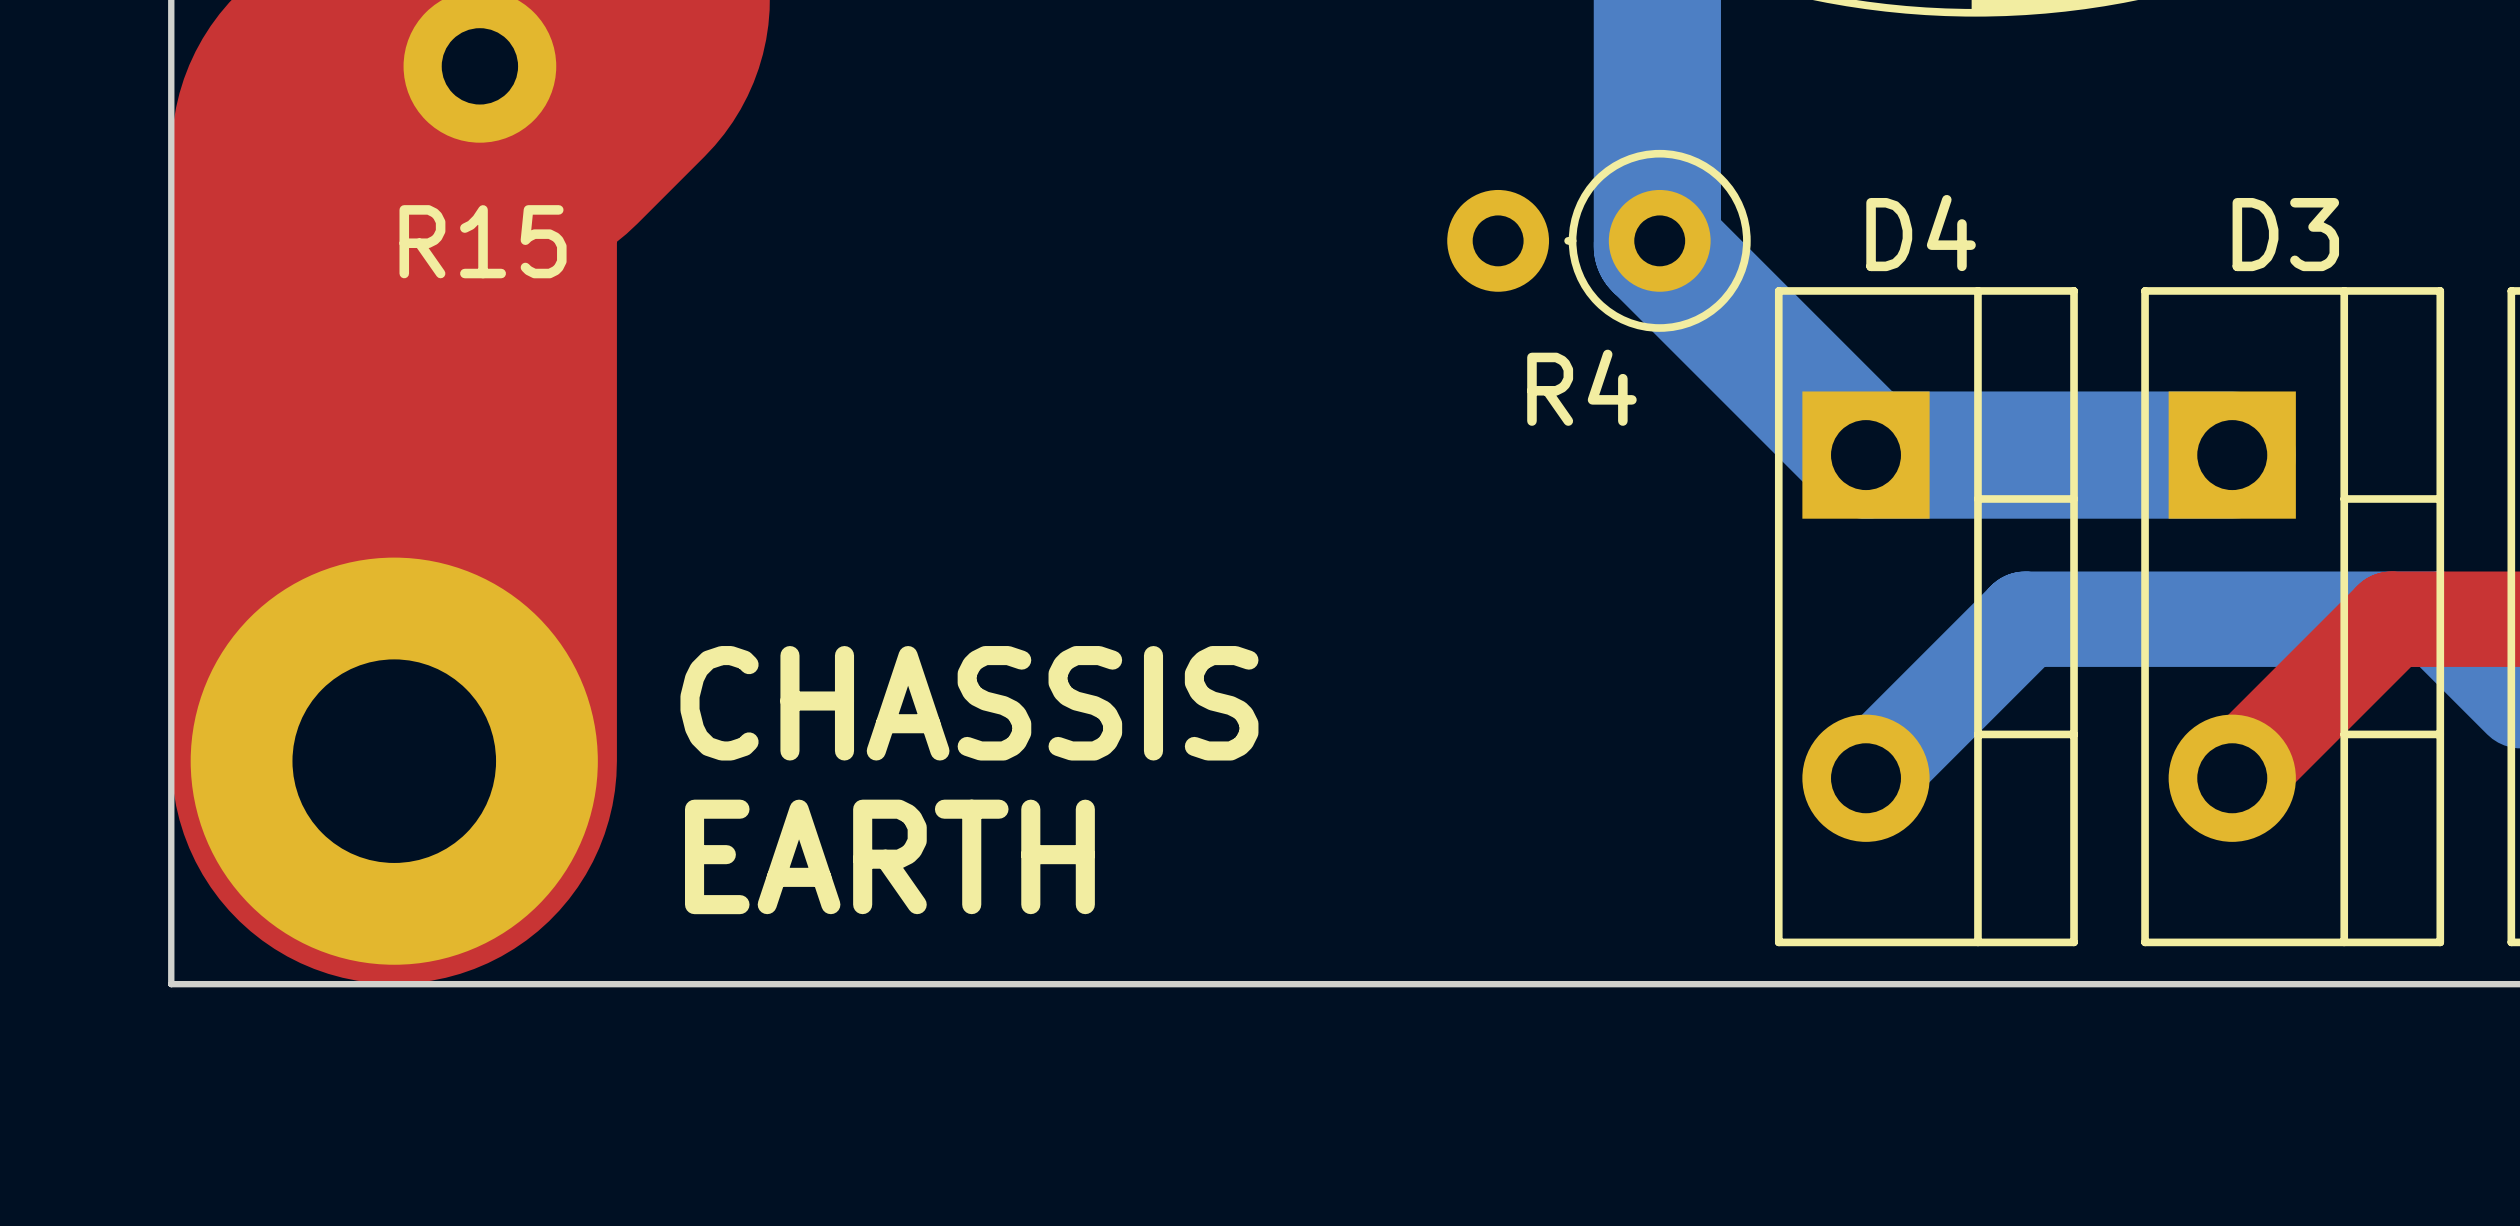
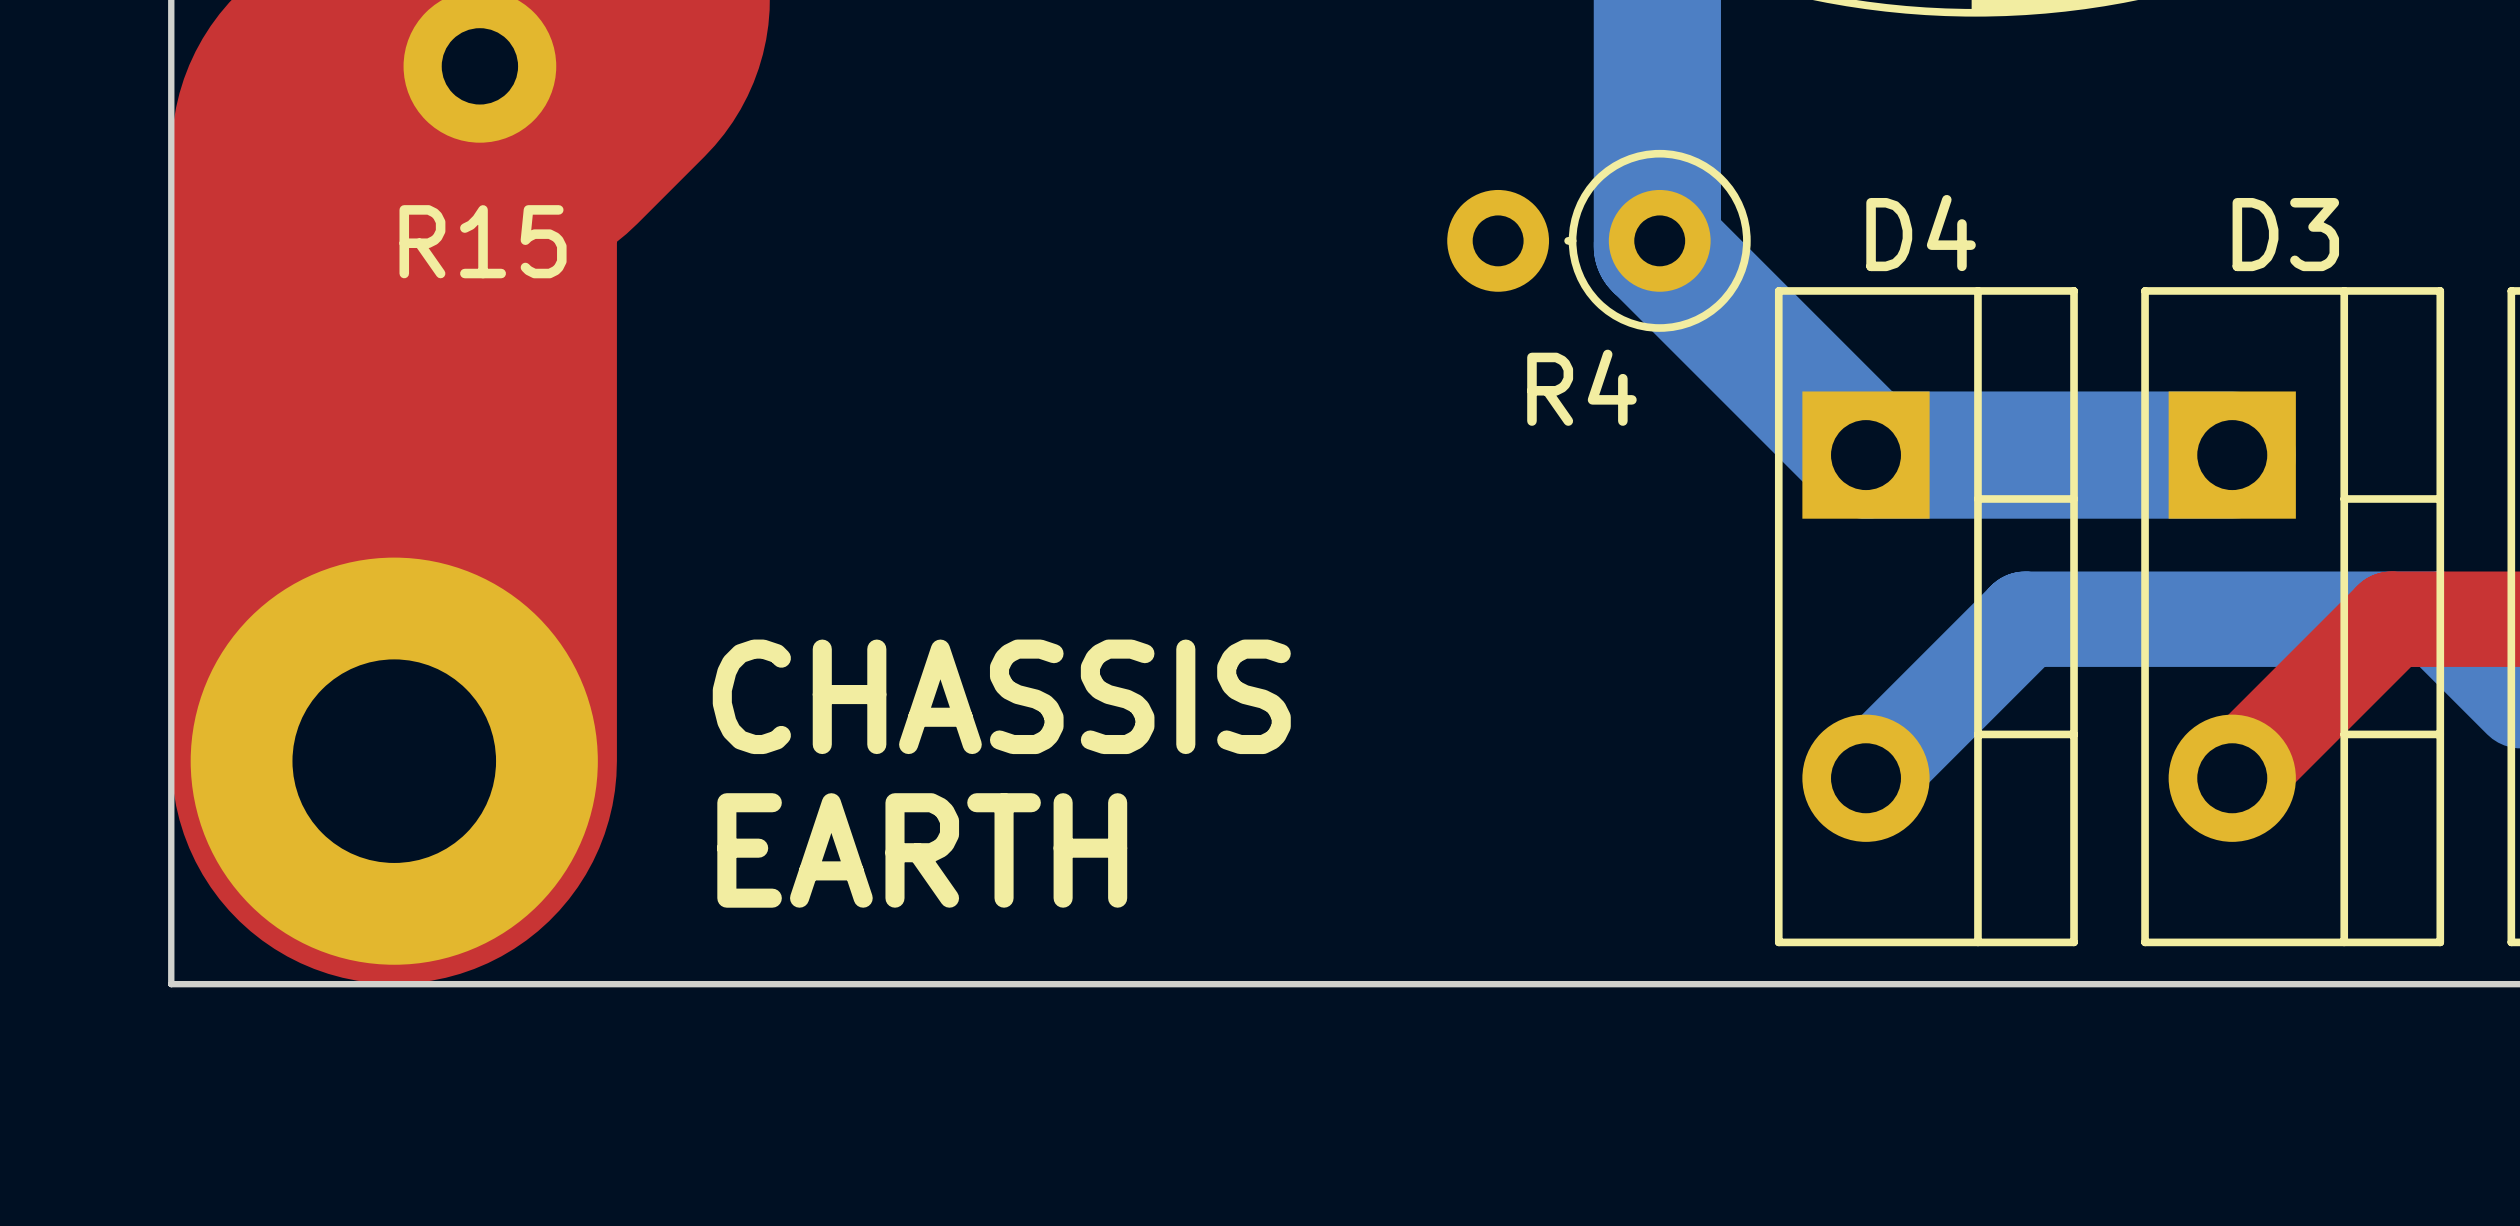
text position: CHASSIS (969, 703) -> CHASSIS (1001, 696)
text position: EARTH (889, 856) -> EARTH (922, 850)

